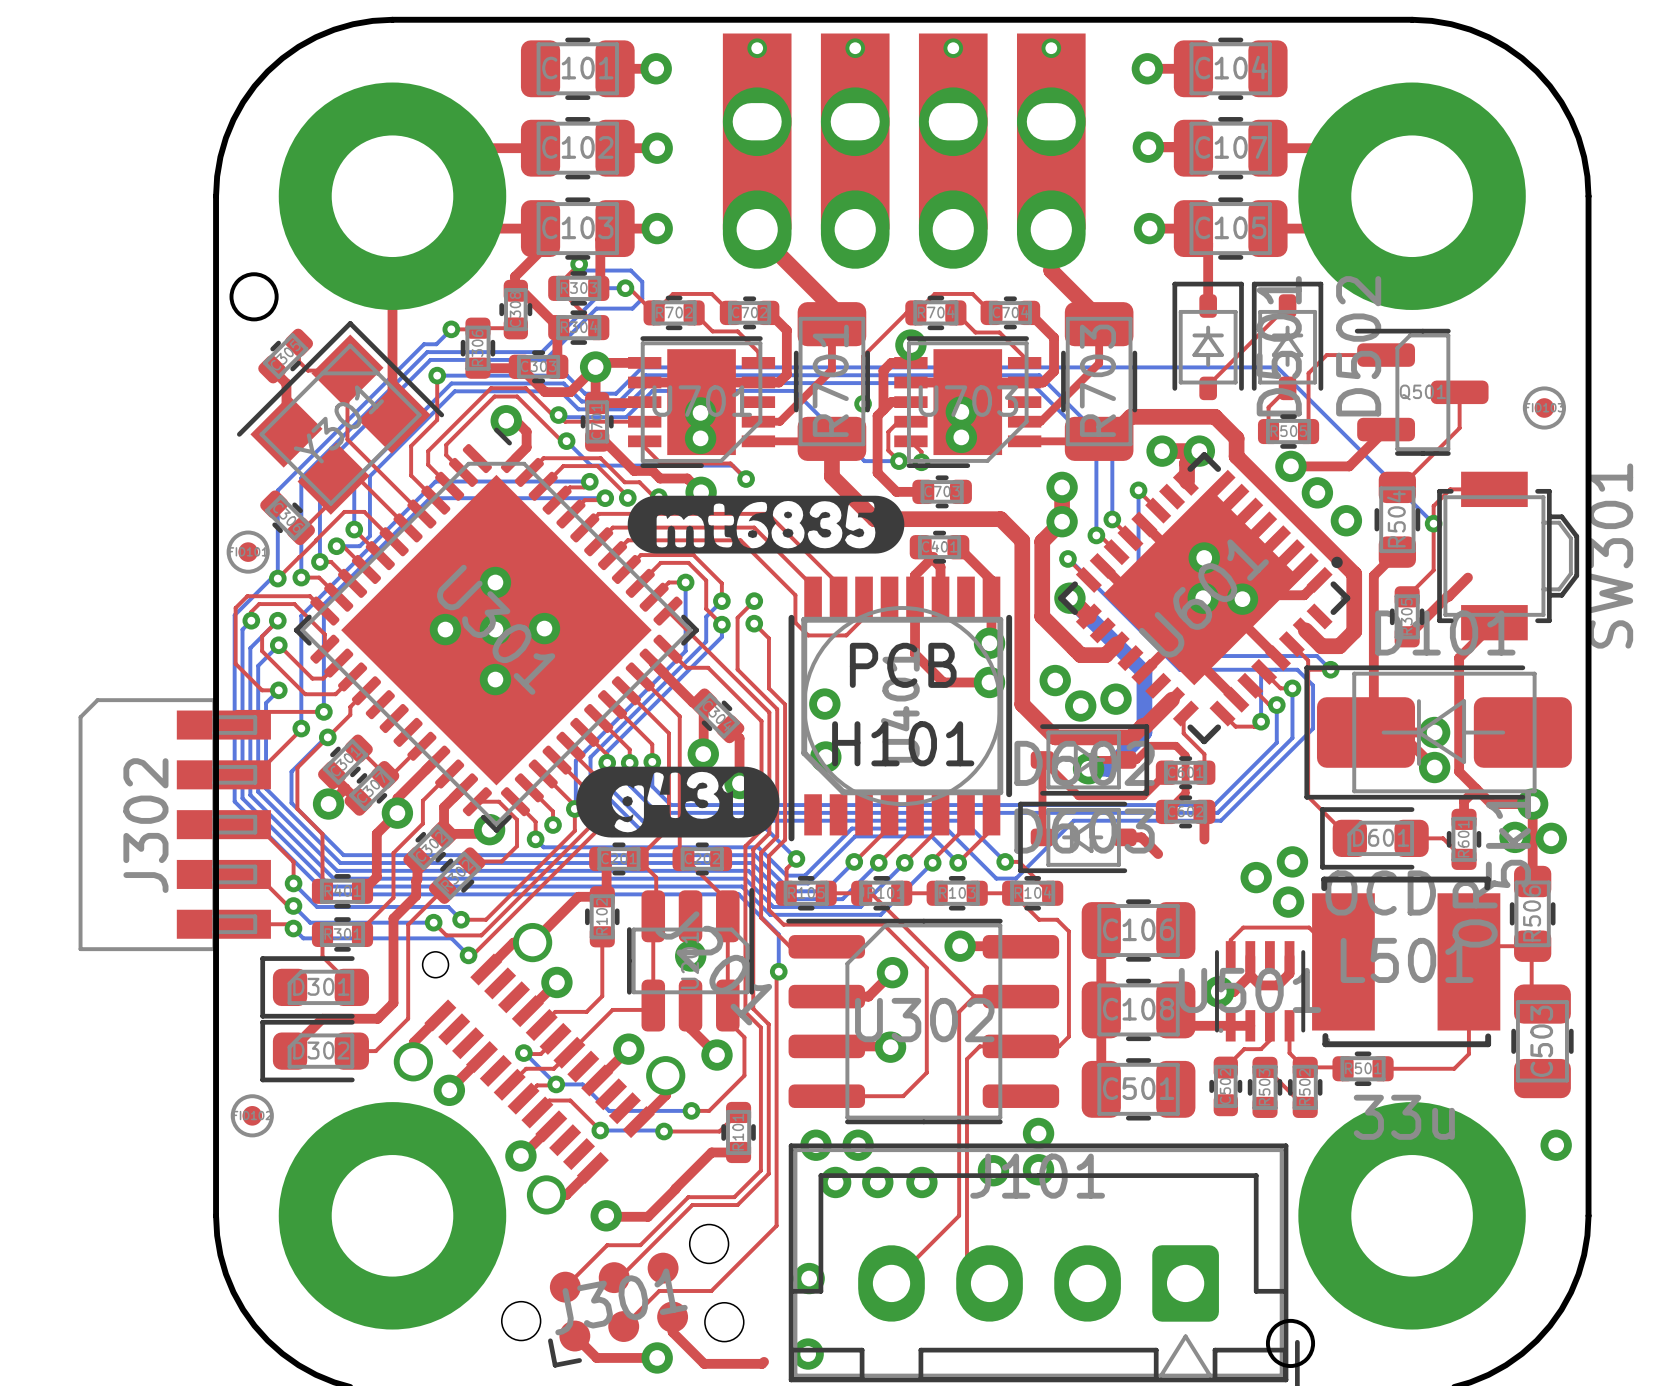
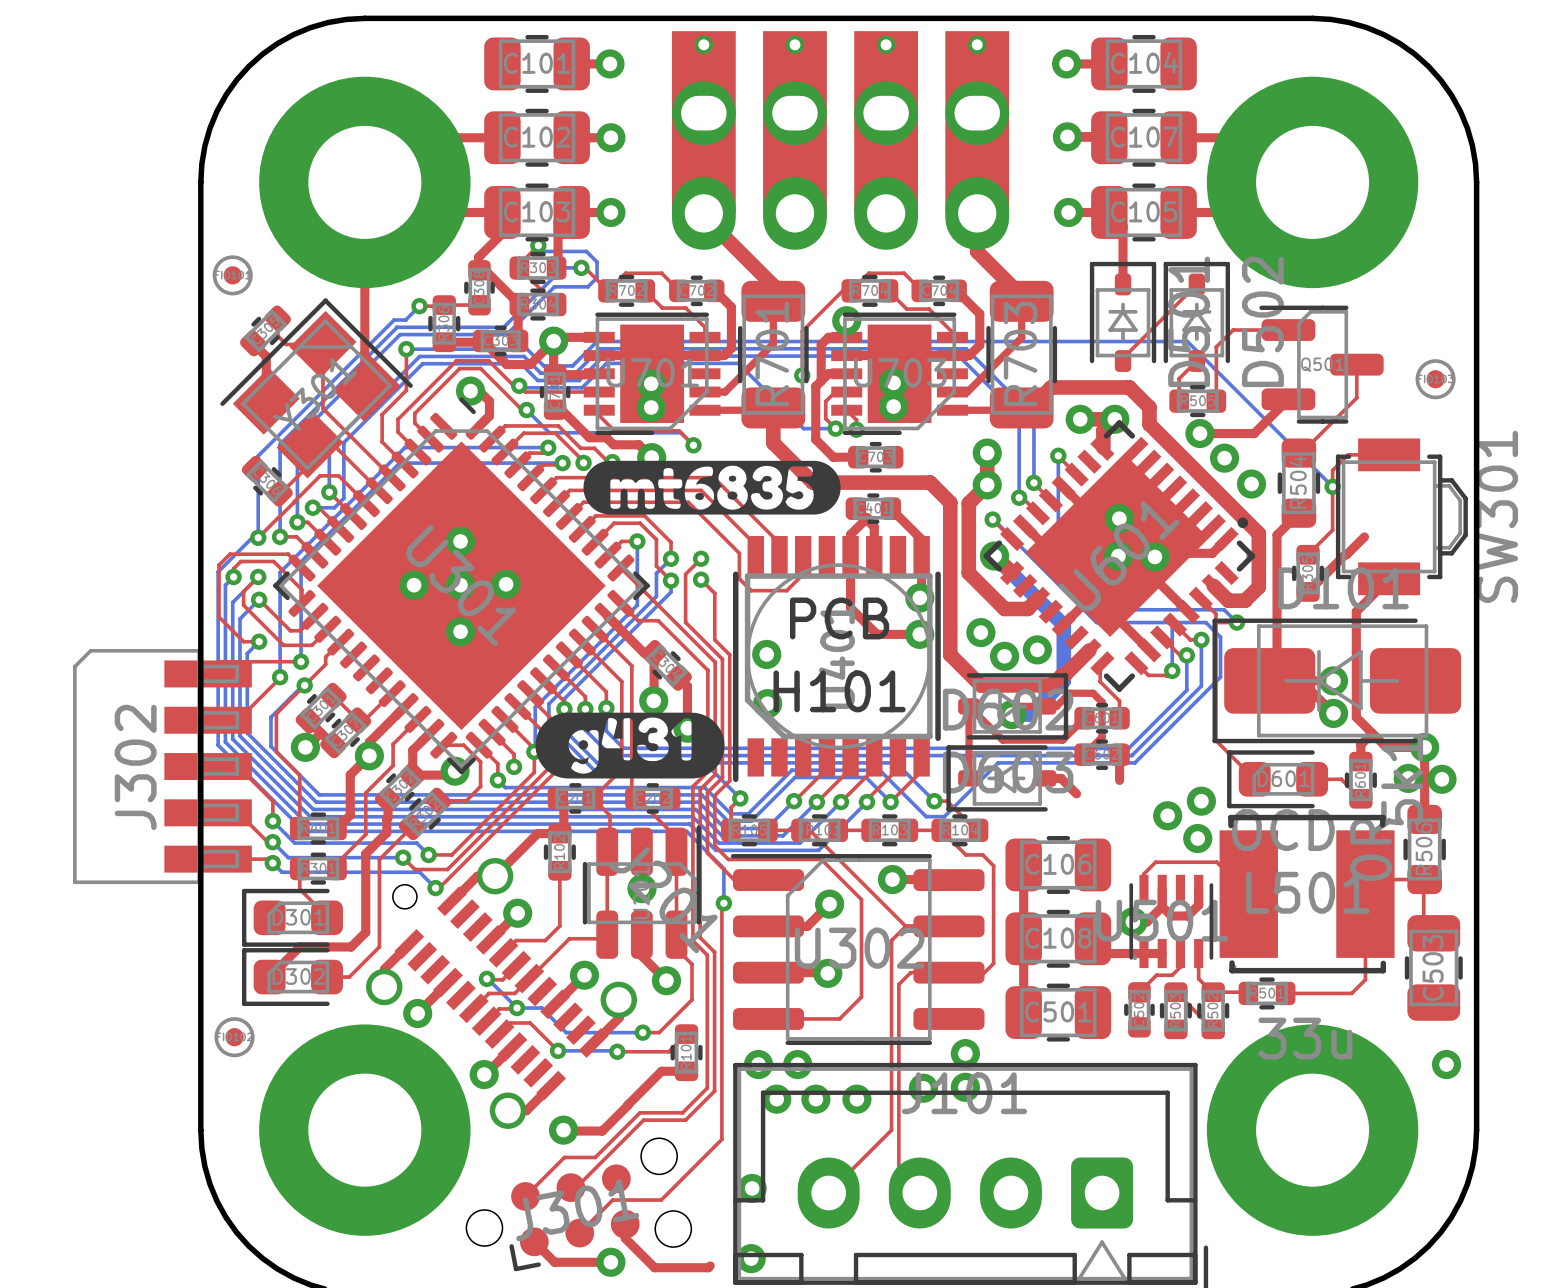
round board edge: [229, 272, 279, 322] -> none
part position: (248, 552) -> (232, 275)
round board edge: [1265, 1318, 1316, 1369] -> none

